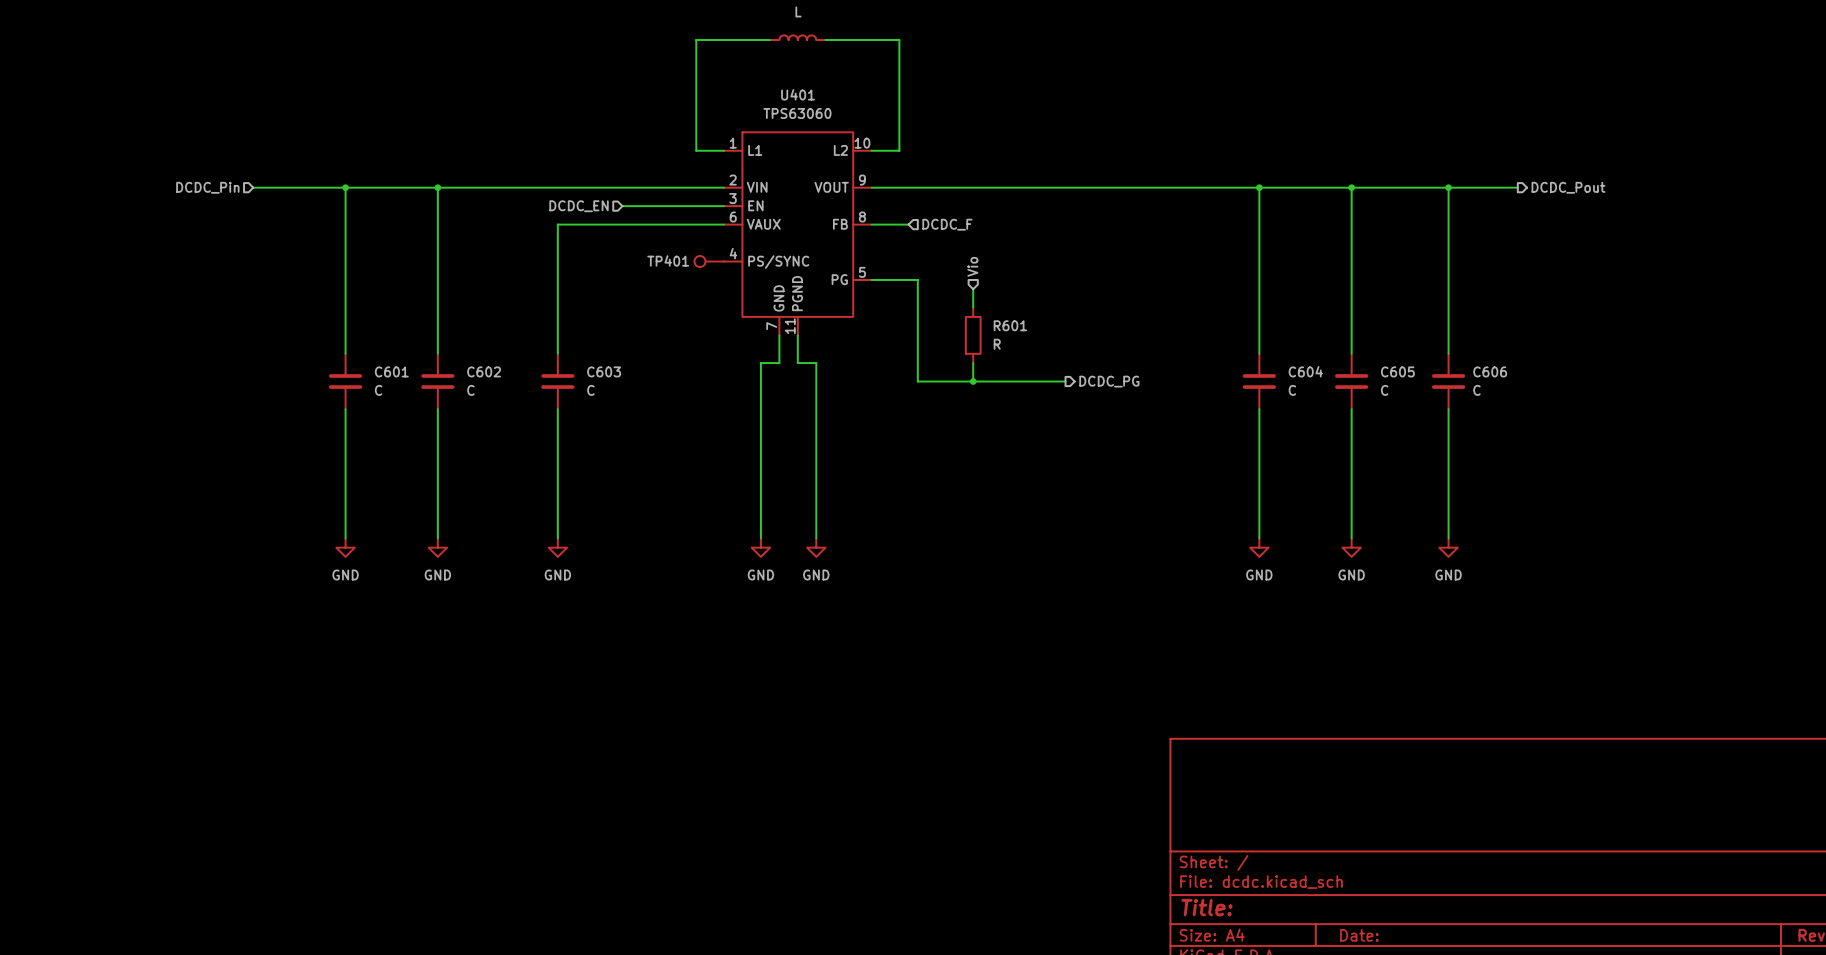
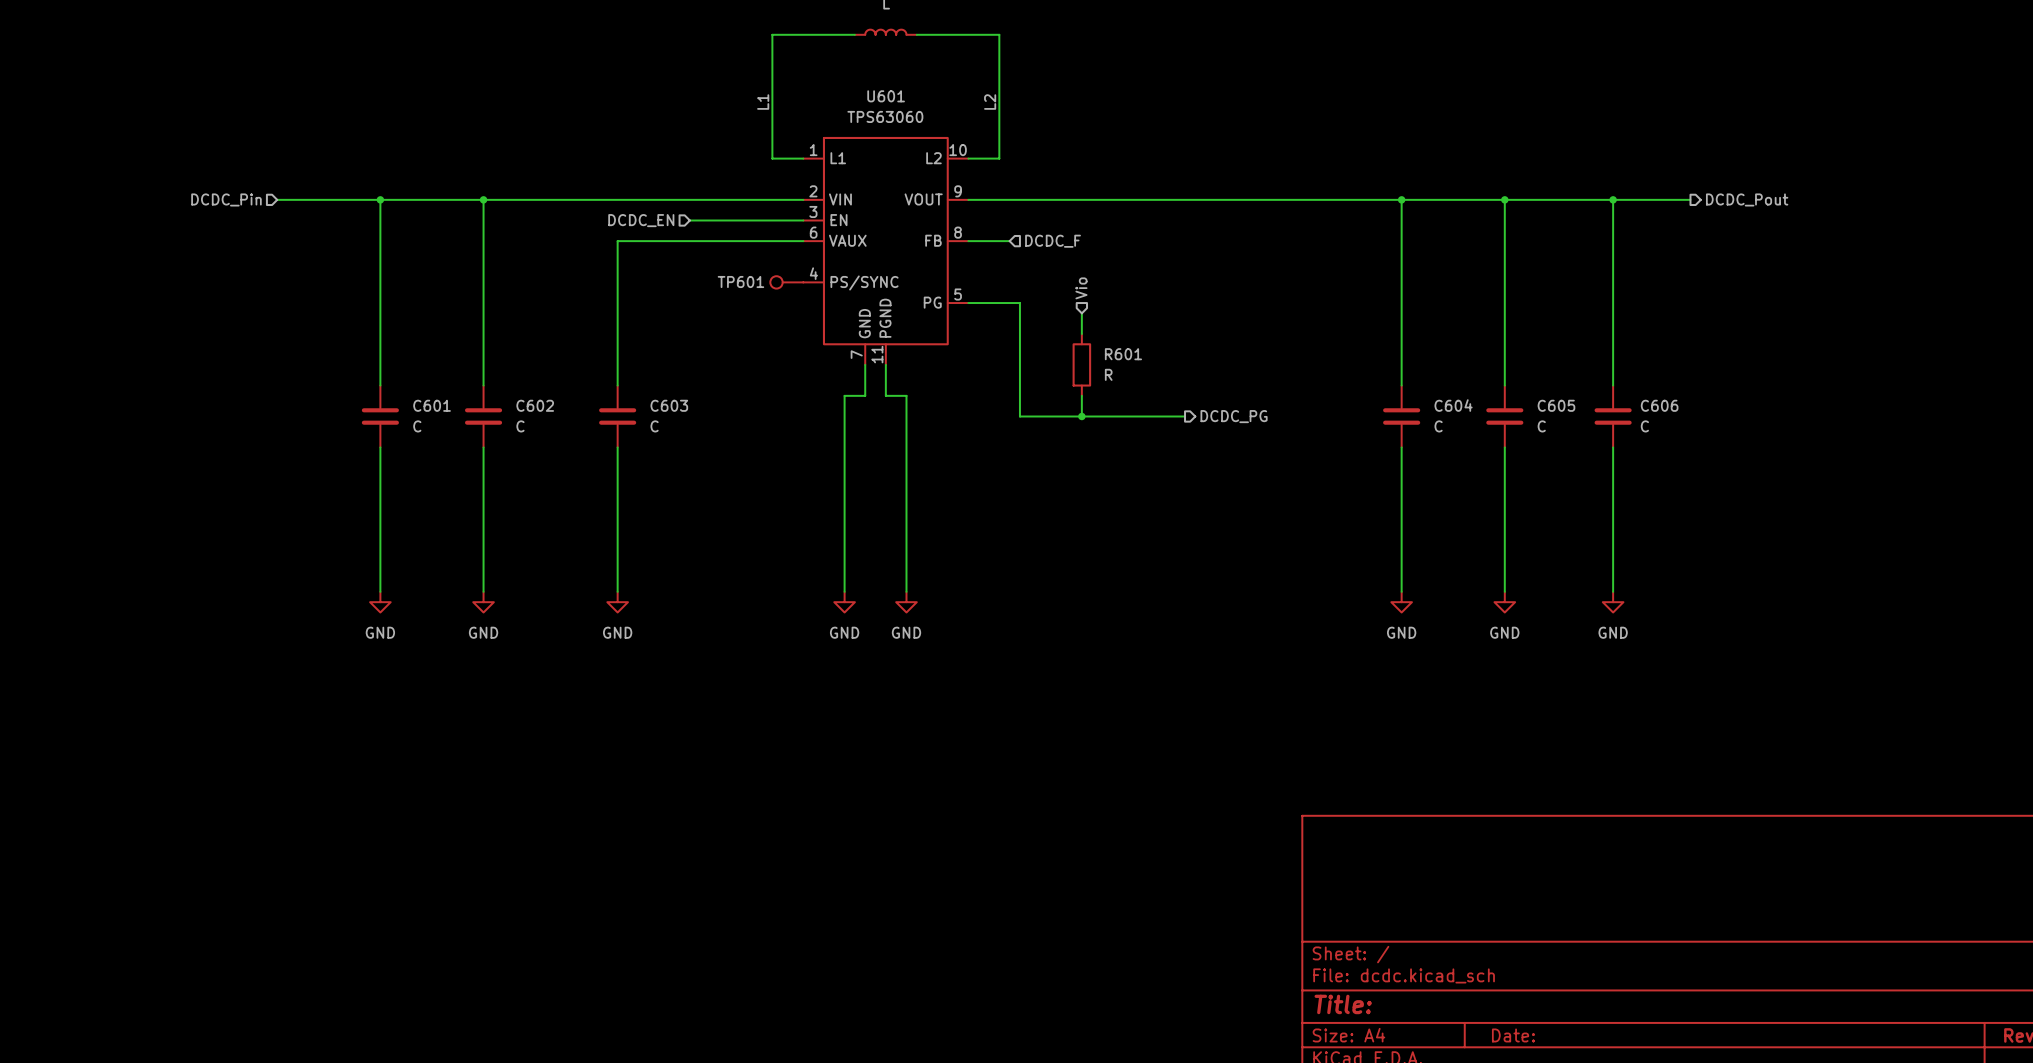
U401 name: U401 (798, 94) -> U601 (886, 96)
label: none -> L1 (763, 102)
label: none -> L2 (990, 102)
TP401 name: TP401 (668, 260) -> TP601 (740, 282)

